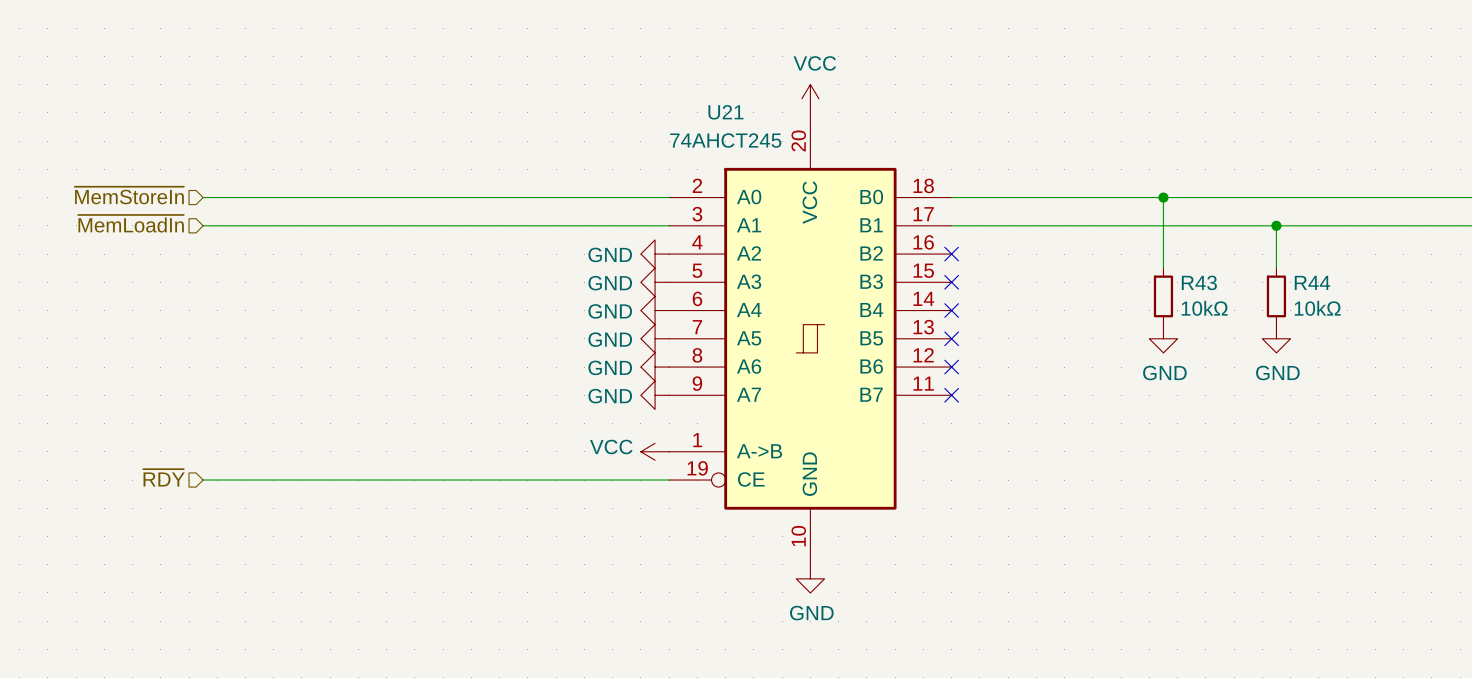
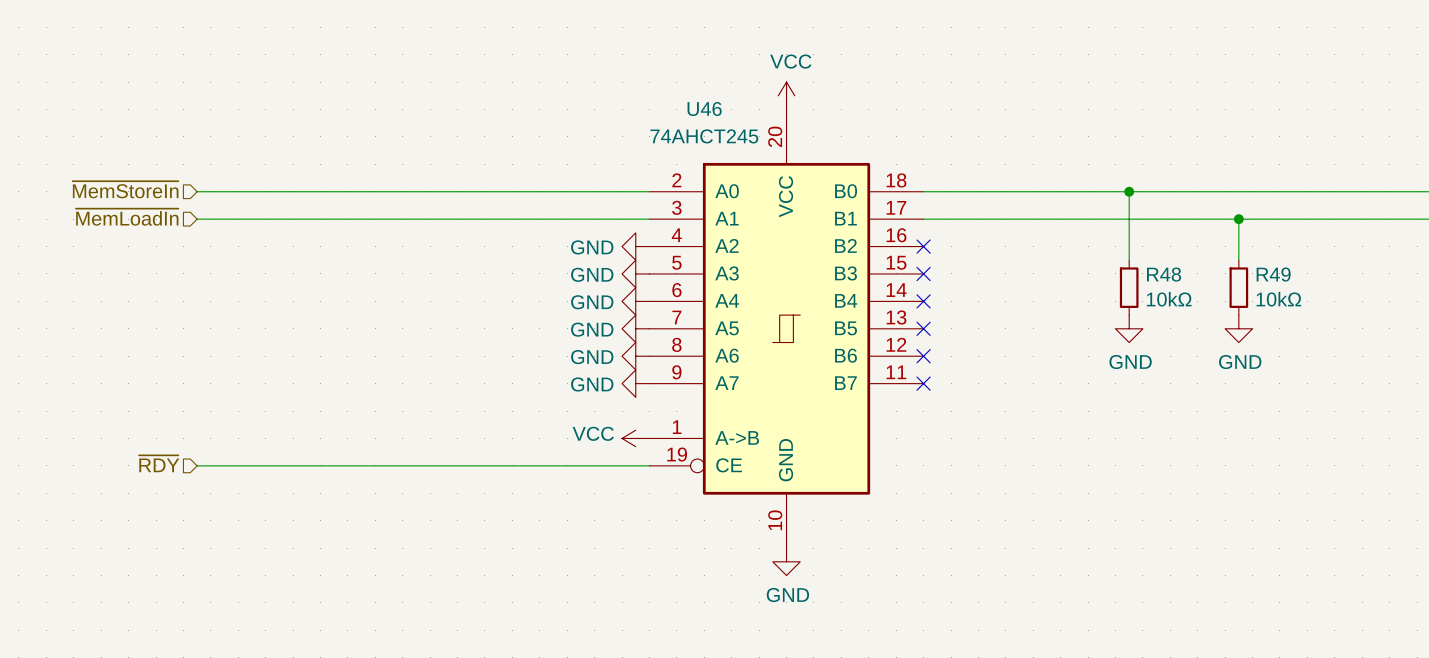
U21 name: U21 (725, 112) -> U46 (704, 108)
R43 name: R43 (1199, 282) -> R48 (1164, 274)
R44 name: R44 (1312, 282) -> R49 (1273, 274)

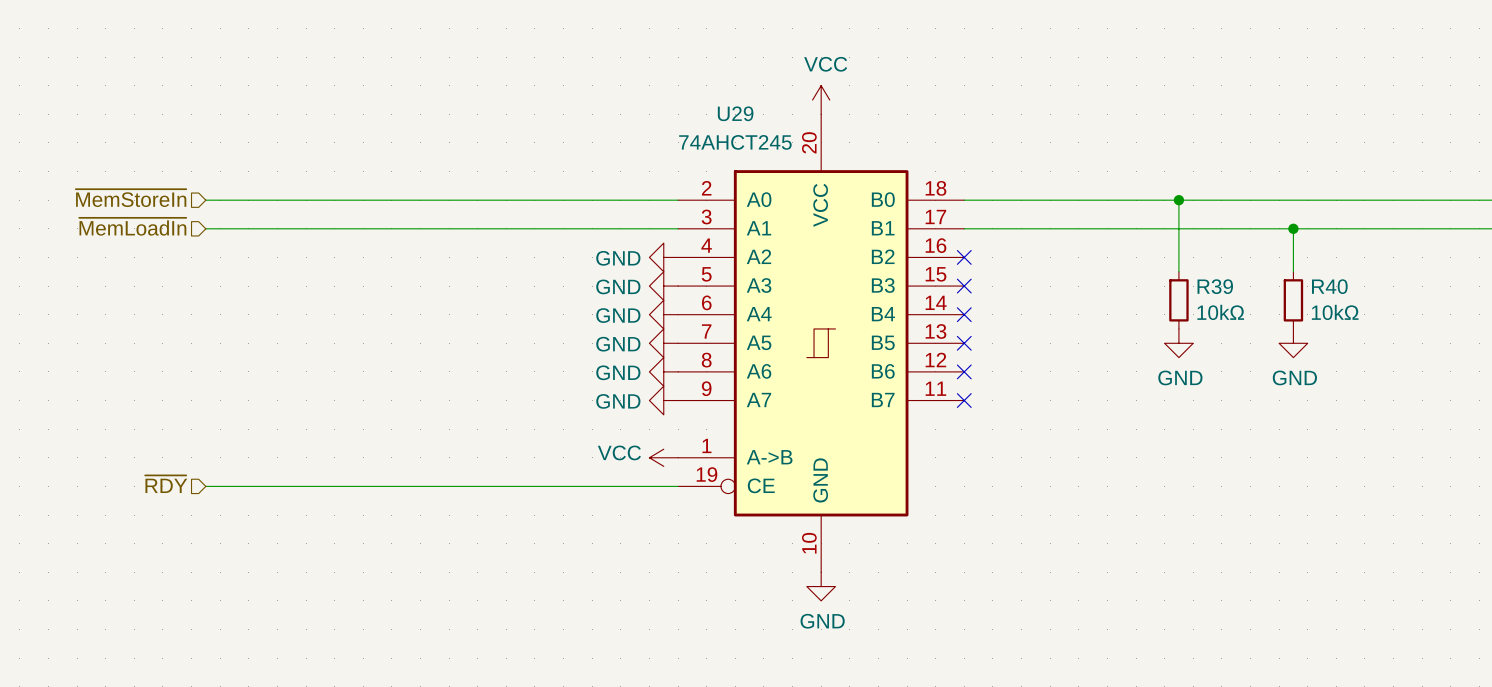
U46 name: U46 (704, 108) -> U29 (735, 113)
R48 name: R48 (1164, 274) -> R39 (1215, 286)
R49 name: R49 (1273, 274) -> R40 (1329, 286)

